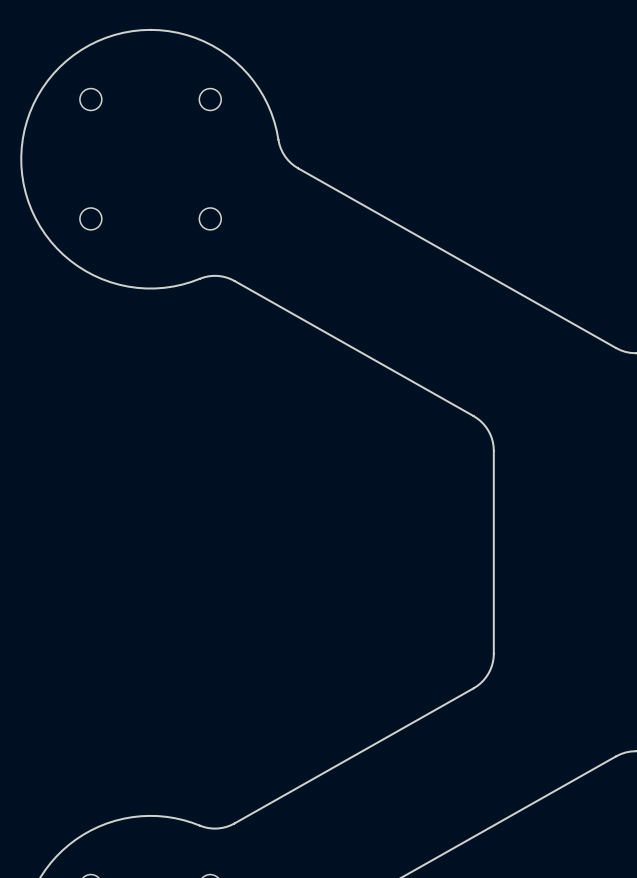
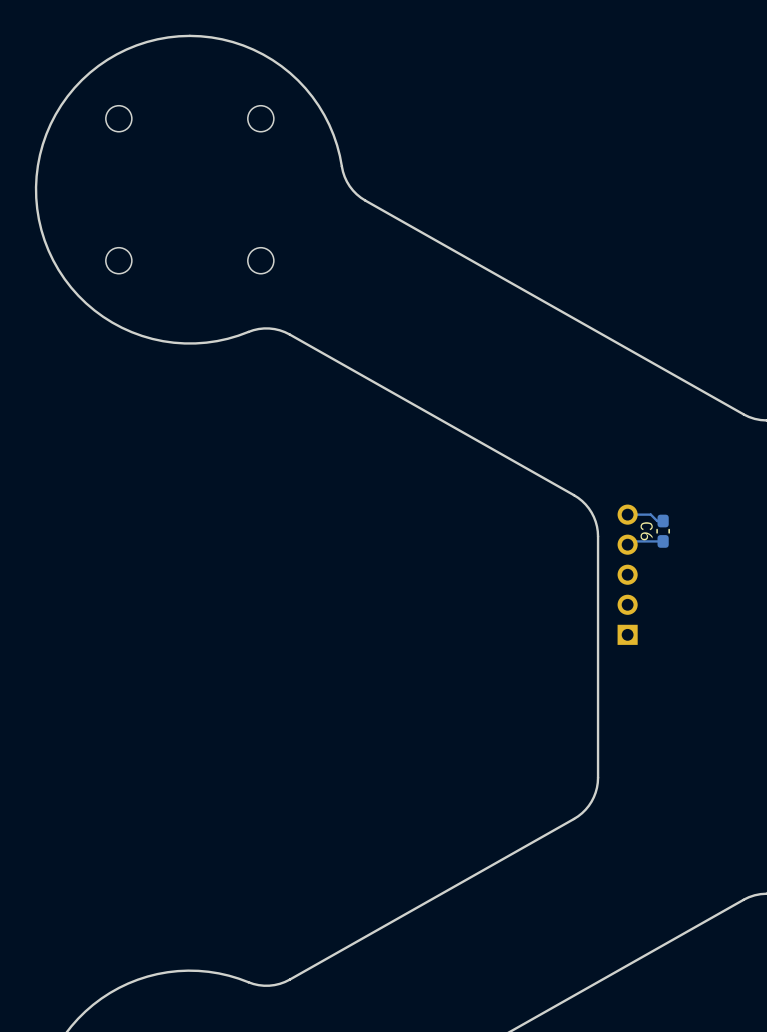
track: none -> (627, 514) (650, 514) (657, 521) (663, 521)
C6: none -> (663, 531)
track: none -> (663, 541) (630, 541) (627, 544)
part: none -> (627, 574)

